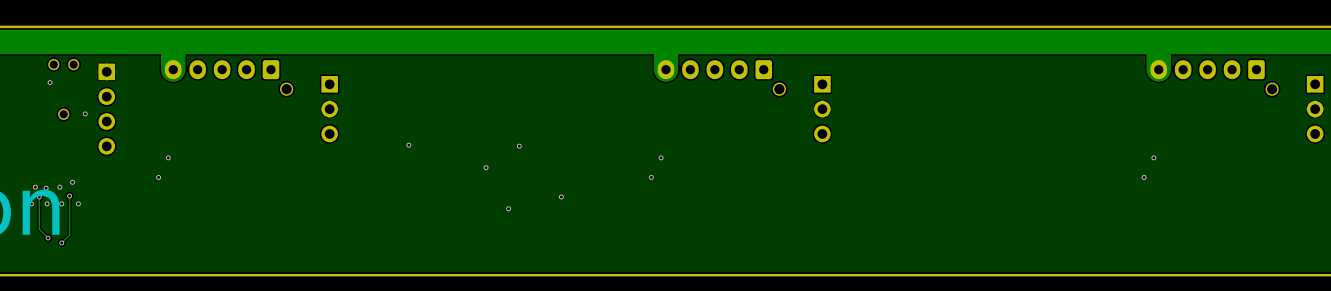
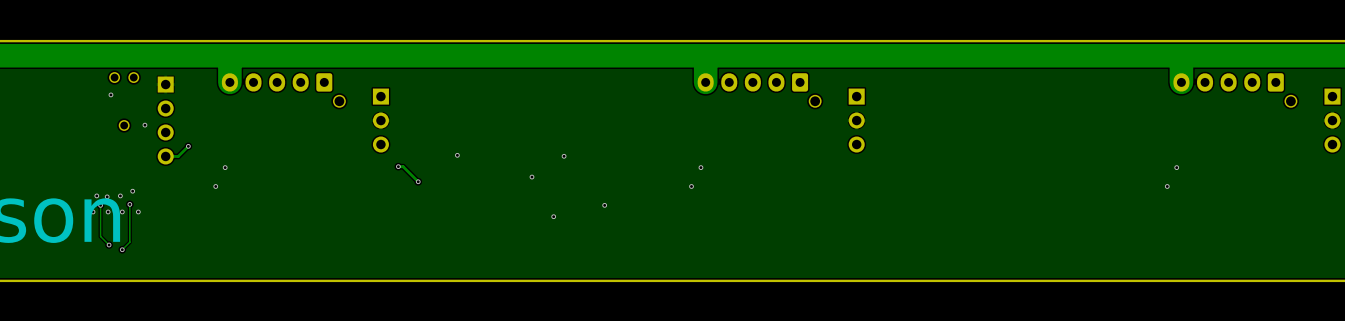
track: none -> (188, 146) (178, 156) (165, 156)
via: none -> (188, 146)
track: none -> (398, 166) (403, 166) (418, 181)
via: none -> (398, 166)
via: none -> (418, 181)

